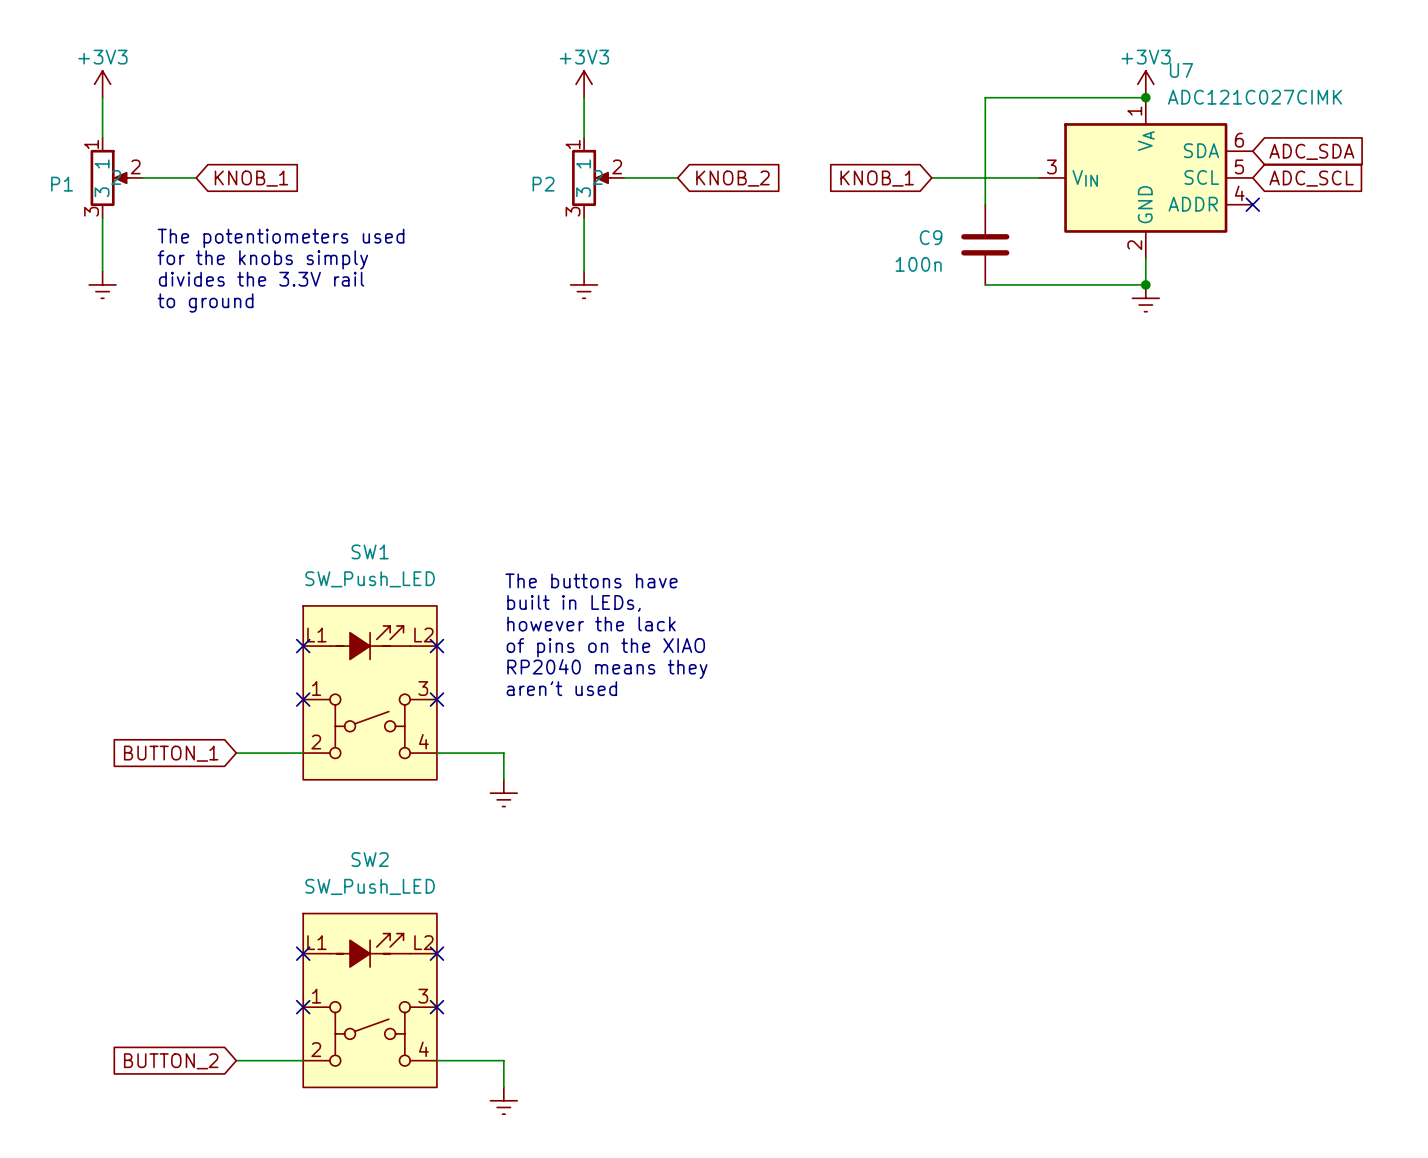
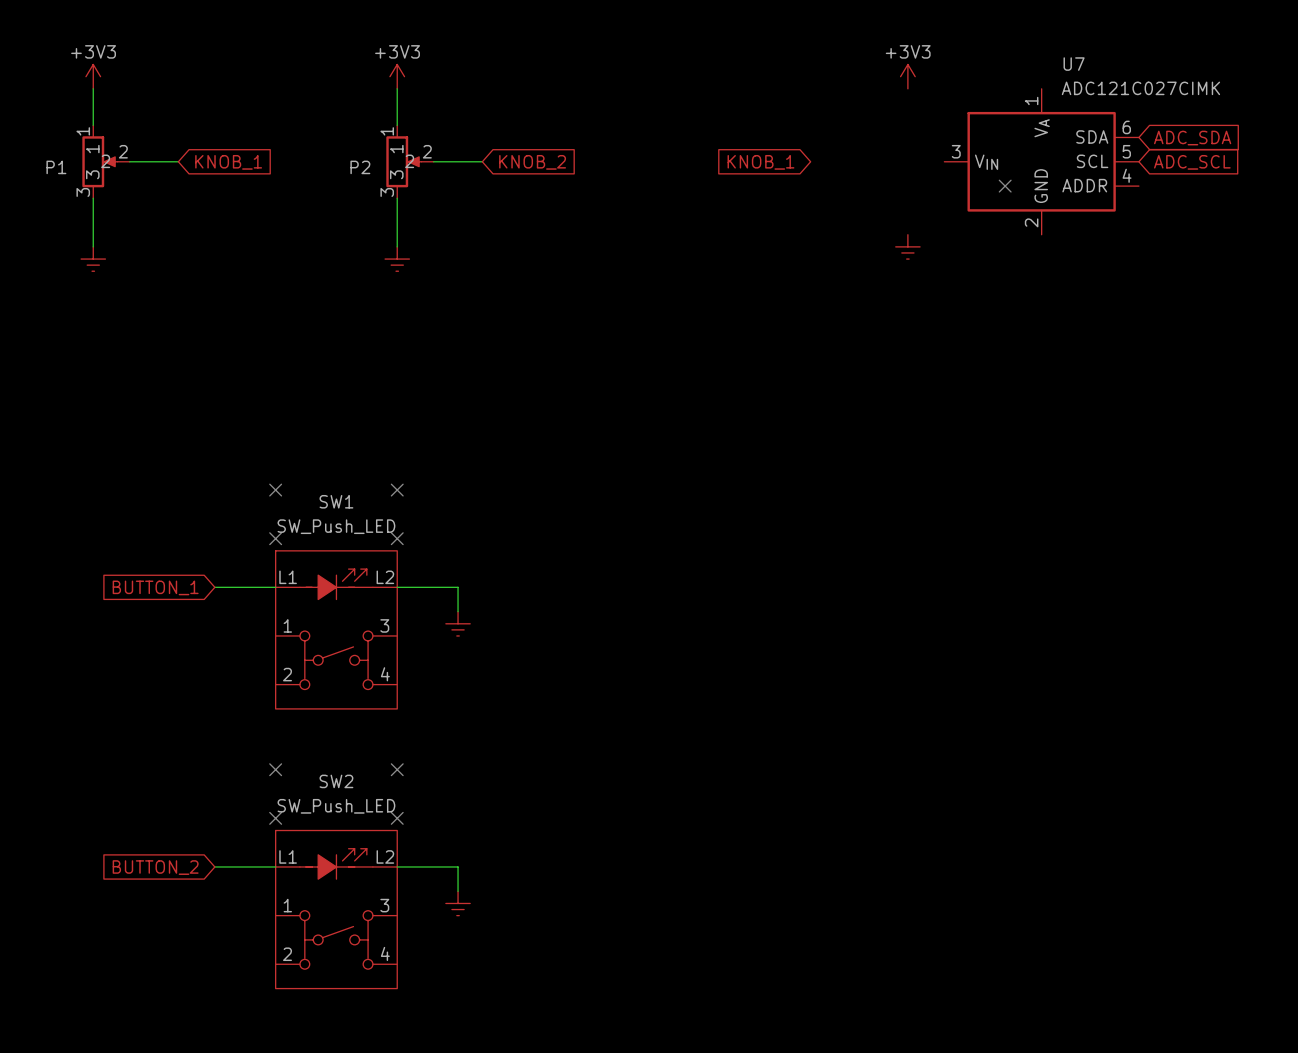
power symbol position: +3V3 (584, 84) -> +3V3 (397, 76)
power symbol position: +3V3 (1145, 84) -> +3V3 (907, 76)
wire: (584, 97) (584, 137) -> (397, 88) (397, 125)
wire: (1145, 97) (985, 97) (985, 204) -> none
junction: (1145, 97) -> none
P2 position: (598, 177) -> (410, 161)
wire: (624, 177) (677, 177) -> (433, 161) (482, 161)
wire: (931, 177) (1038, 177) -> none
global label position: KNOB_2 (732, 178) -> KNOB_2 (532, 162)
global label position: KNOB_1 (877, 178) -> KNOB_1 (760, 162)
no-connect mark: none -> (1005, 186)
no-connect mark: (1252, 204) -> none
wire: (584, 218) (584, 271) -> (397, 198) (397, 246)
text: The potentiometers used (281, 238) -> none
C9: 100n (985, 244) -> none
wire: (1145, 258) (1145, 284) (985, 284) -> none
text: for the knobs simply (262, 259) -> none
text: divides the 3.3V rail (261, 279) -> none
power symbol position: (584, 284) -> (397, 259)
junction: (1145, 284) -> none
power symbol position: (1145, 298) -> (907, 246)
text: to ground (205, 302) -> none
no-connect mark: none -> (275, 490)
no-connect mark: none -> (397, 490)
text: The buttons have (591, 580) -> none
no-connect mark: none -> (275, 538)
no-connect mark: none -> (397, 538)
text: built in LEDs, (573, 603) -> none
text: however the lack (591, 624) -> none
no-connect mark: (303, 646) -> none
no-connect mark: (436, 646) -> none
text: of pins on the XIAO (605, 647) -> none
text: RP2040 means they (607, 668) -> none
power symbol: none -> (458, 623)
text: aren't used (561, 688) -> none
no-connect mark: (303, 699) -> none
no-connect mark: (436, 699) -> none
global label position: BUTTON_1 (171, 753) -> BUTTON_1 (155, 587)
wire: (236, 753) (303, 753) -> (214, 587) (275, 587)
wire: (436, 753) (503, 753) (503, 779) -> (397, 587) (458, 587) (458, 611)
power symbol: (503, 793) -> none
no-connect mark: none -> (275, 769)
no-connect mark: none -> (397, 769)
no-connect mark: none -> (275, 818)
no-connect mark: none -> (397, 818)
no-connect mark: (303, 953) -> none
no-connect mark: (436, 953) -> none
power symbol: none -> (458, 903)
no-connect mark: (303, 1007) -> none
no-connect mark: (436, 1007) -> none
wire: (236, 1060) (303, 1060) -> (214, 866) (275, 866)
wire: (436, 1060) (503, 1060) (503, 1087) -> (397, 866) (458, 866) (458, 891)
global label position: BUTTON_2 (171, 1061) -> BUTTON_2 (155, 867)
power symbol: (503, 1100) -> none

